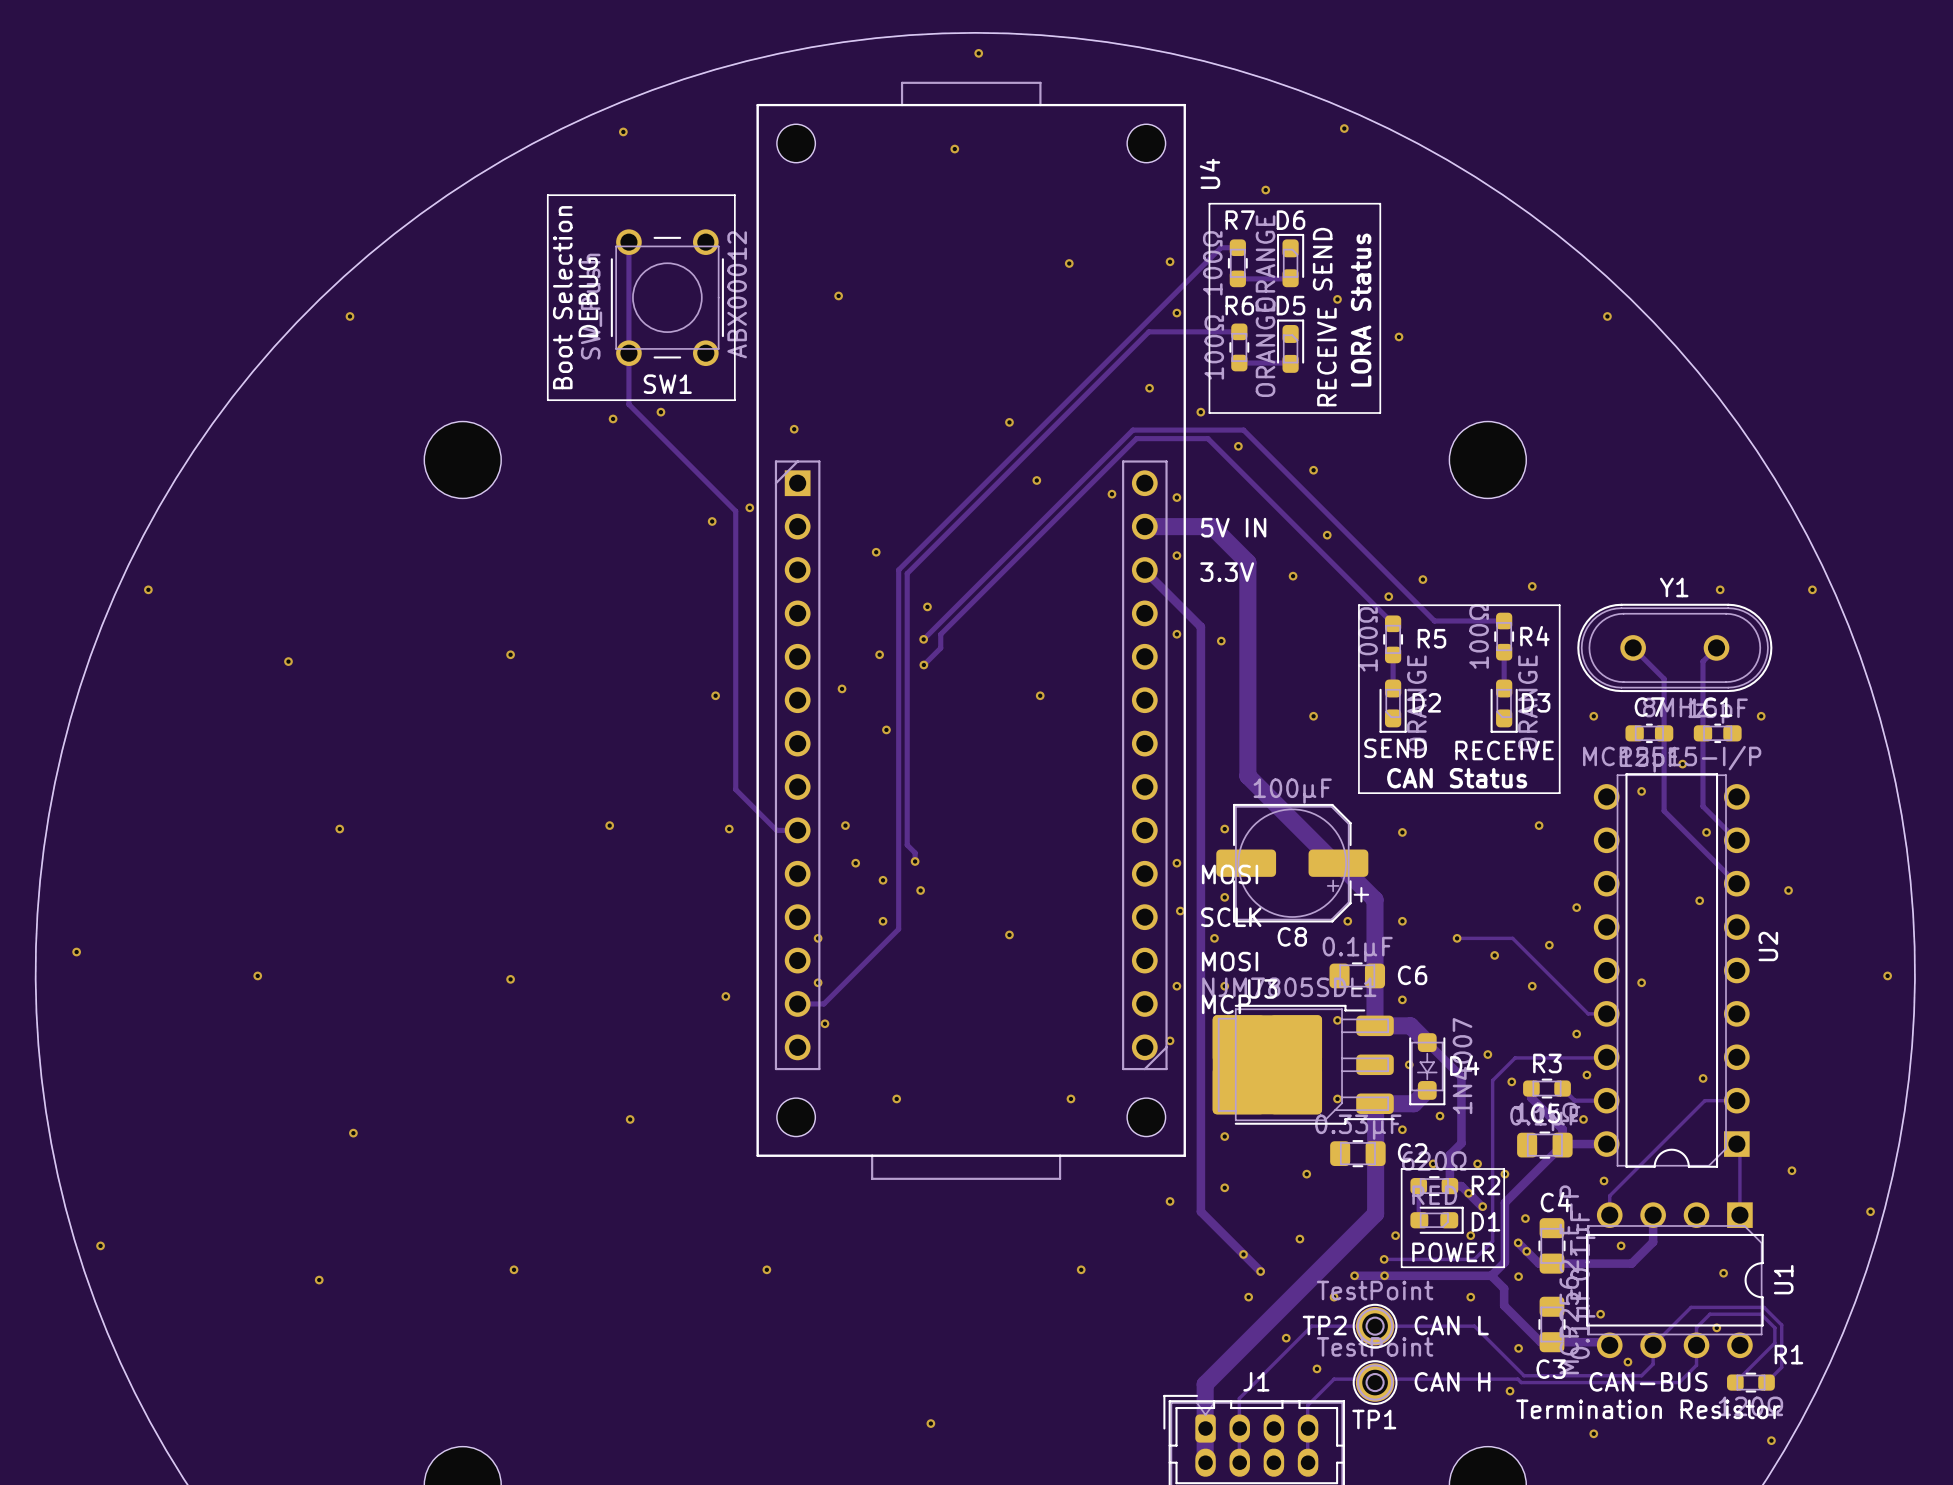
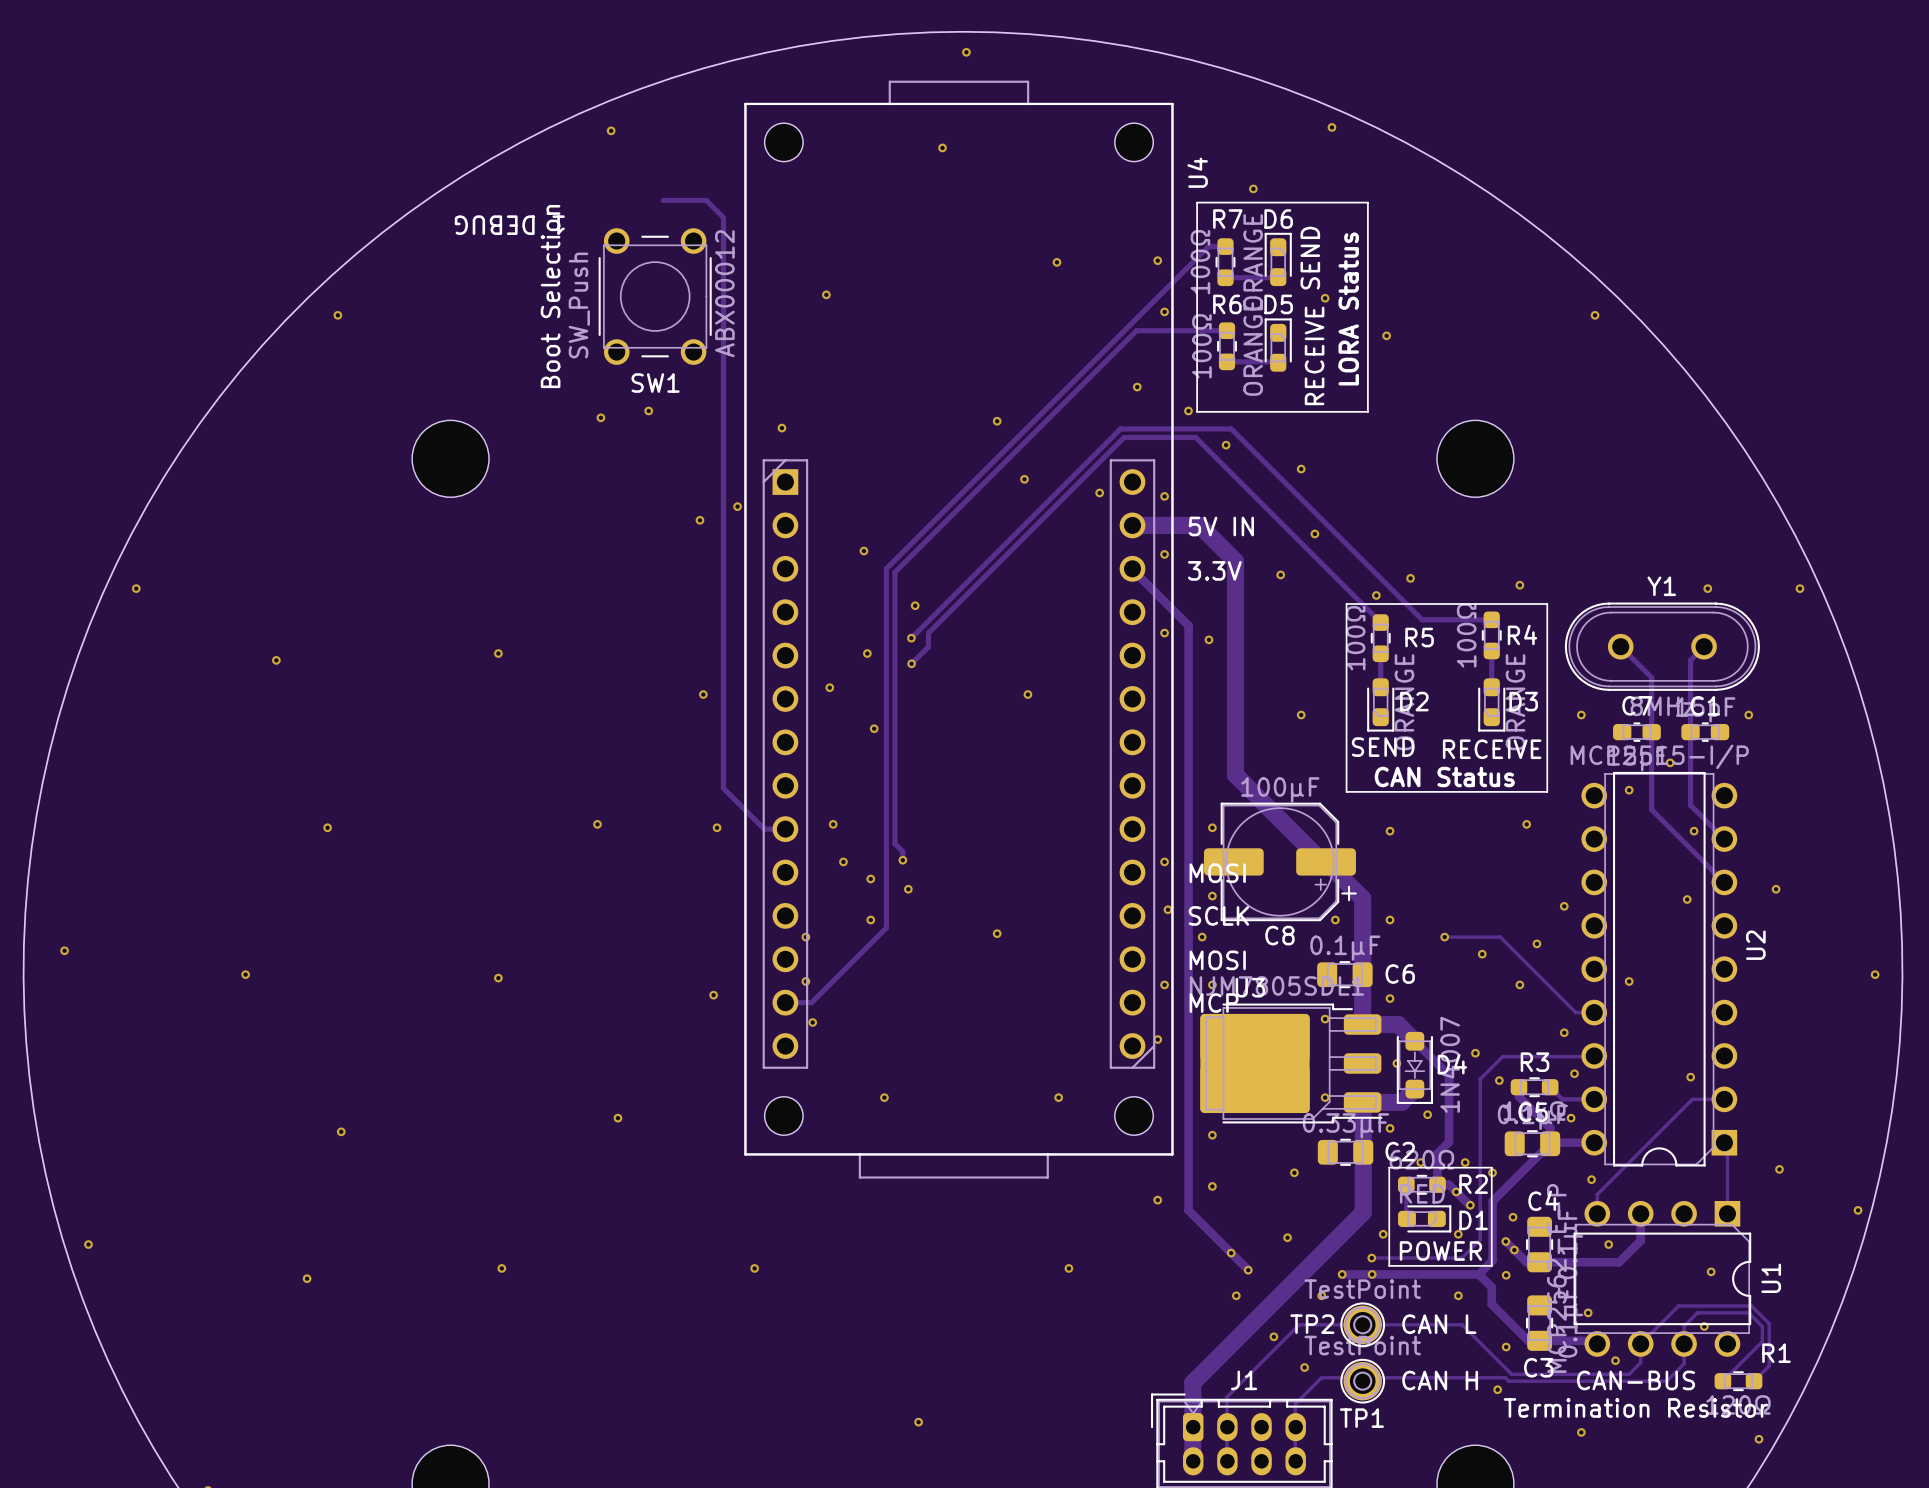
line: (547, 195) (734, 195) (734, 400) (547, 400) (547, 195) -> none
text: none -> 1 DEBUG (509, 225)
track: (628, 242) (628, 404) (735, 511) -> (663, 200) (706, 200) (723, 217) (723, 510)
text: DEBUG (588, 297) -> none

